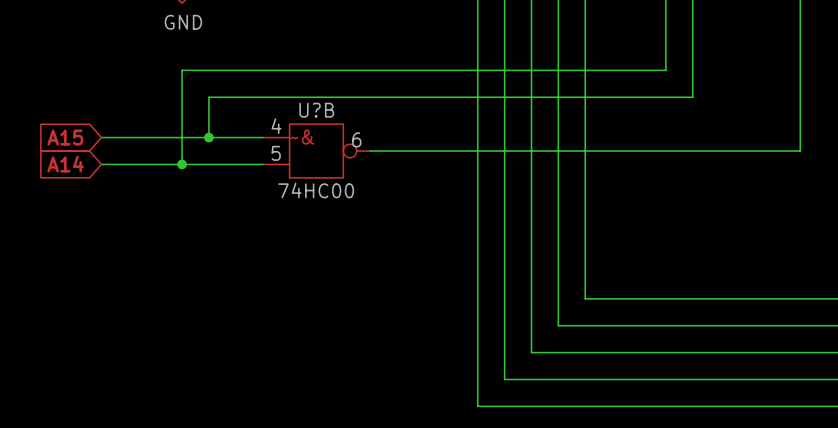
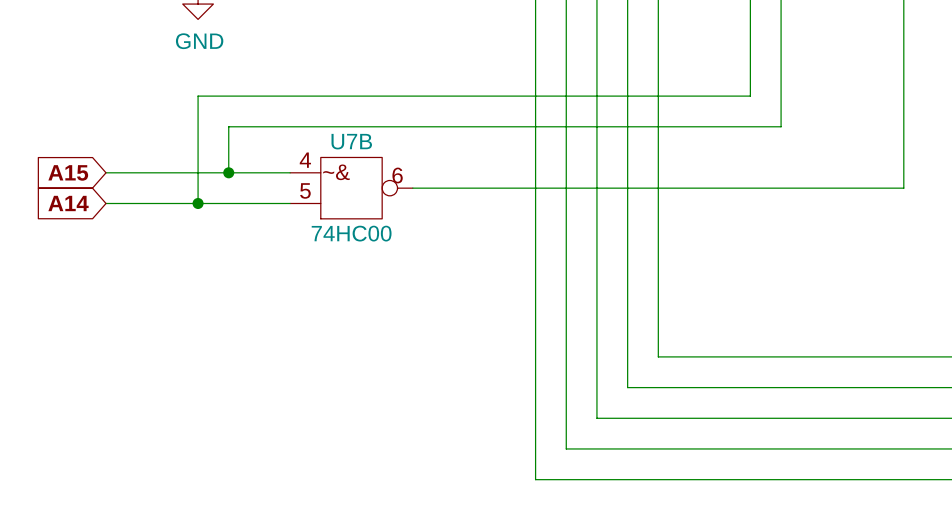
U?B name: U?B (316, 110) -> U7B (351, 141)

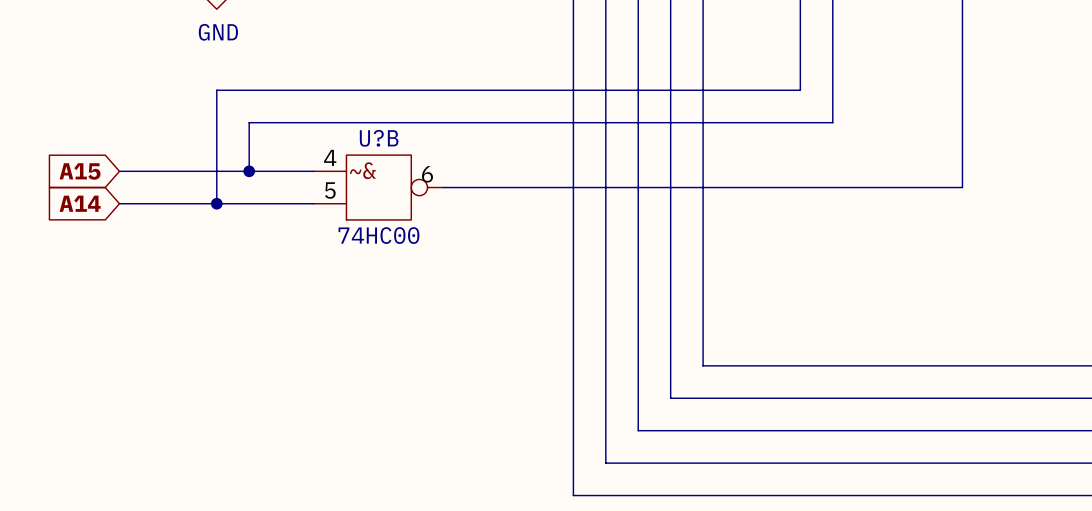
U7B name: U7B (351, 141) -> U?B (379, 138)

